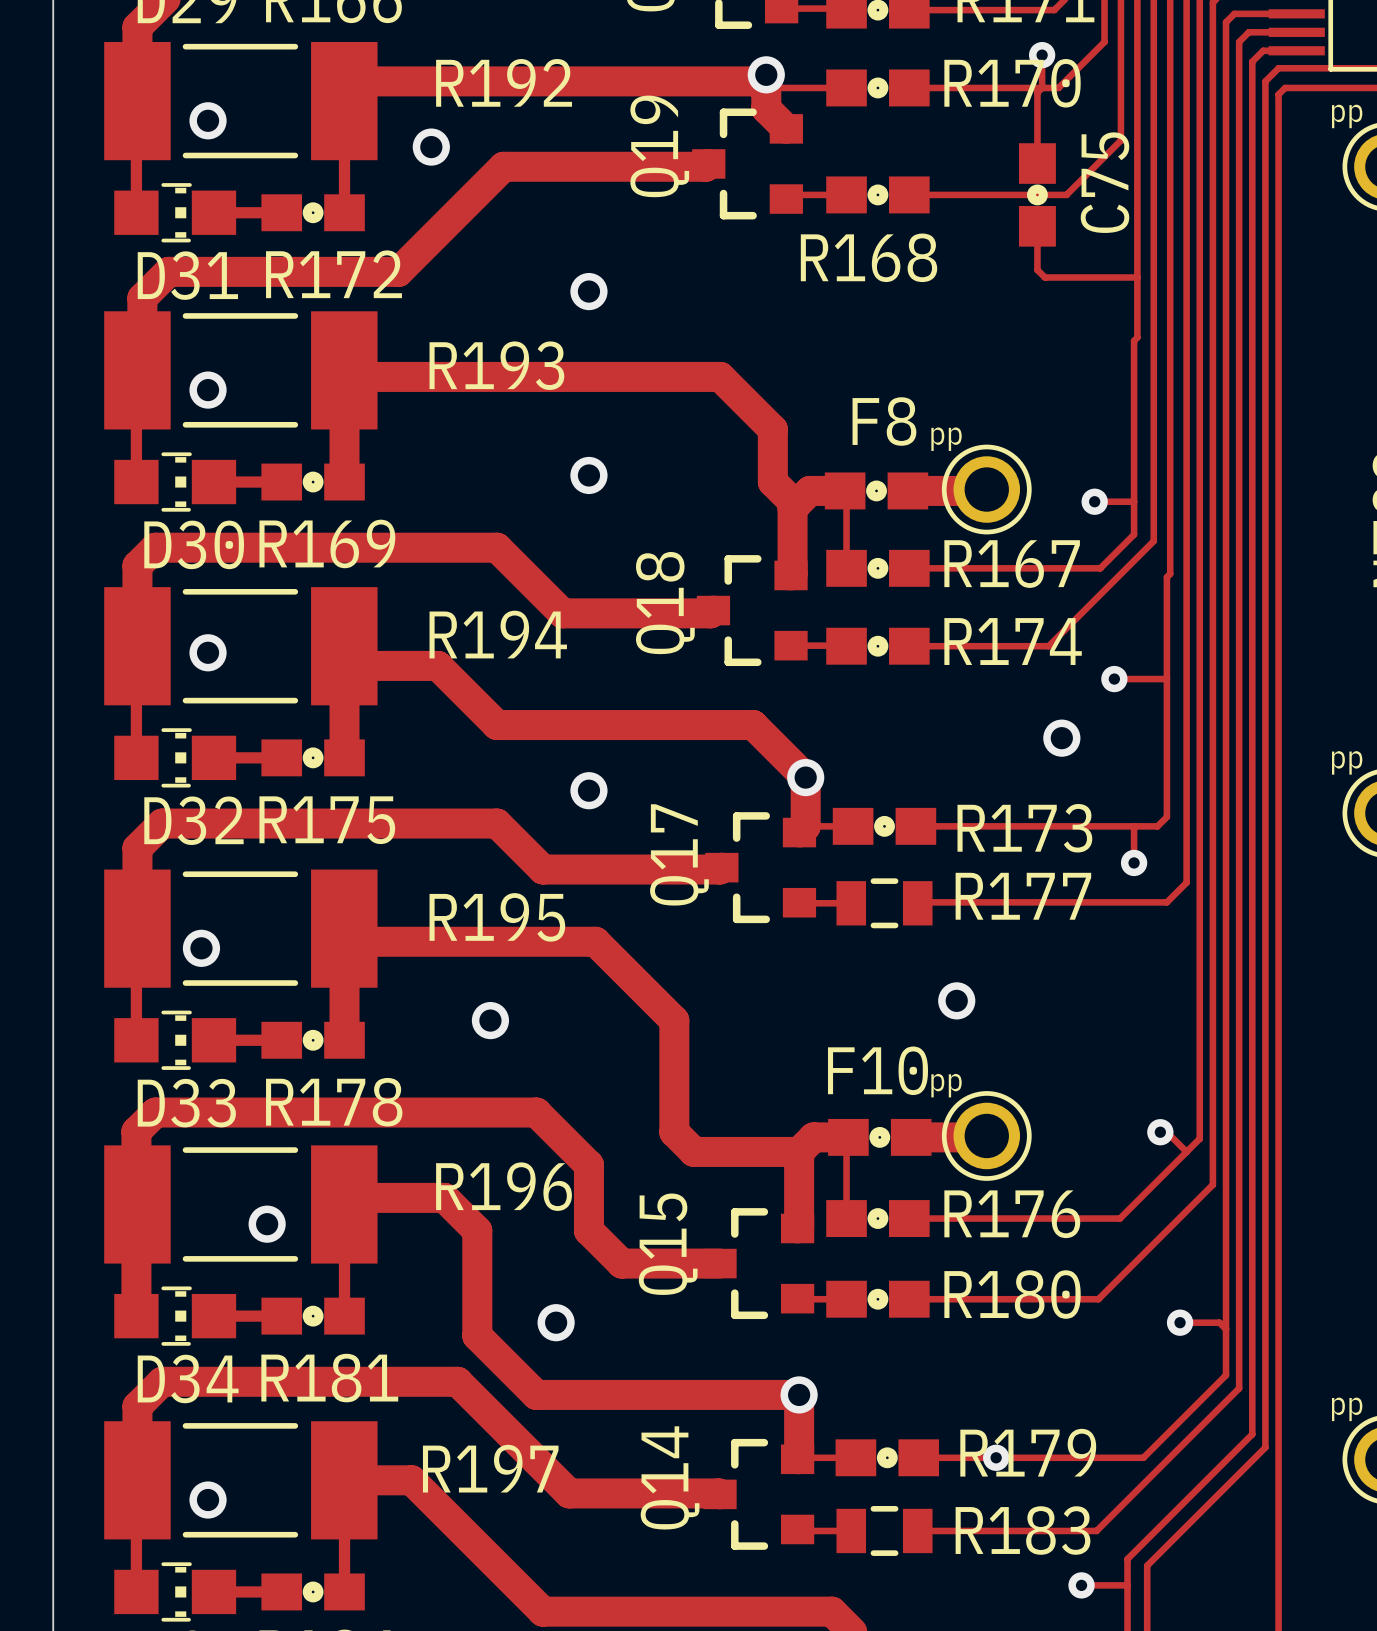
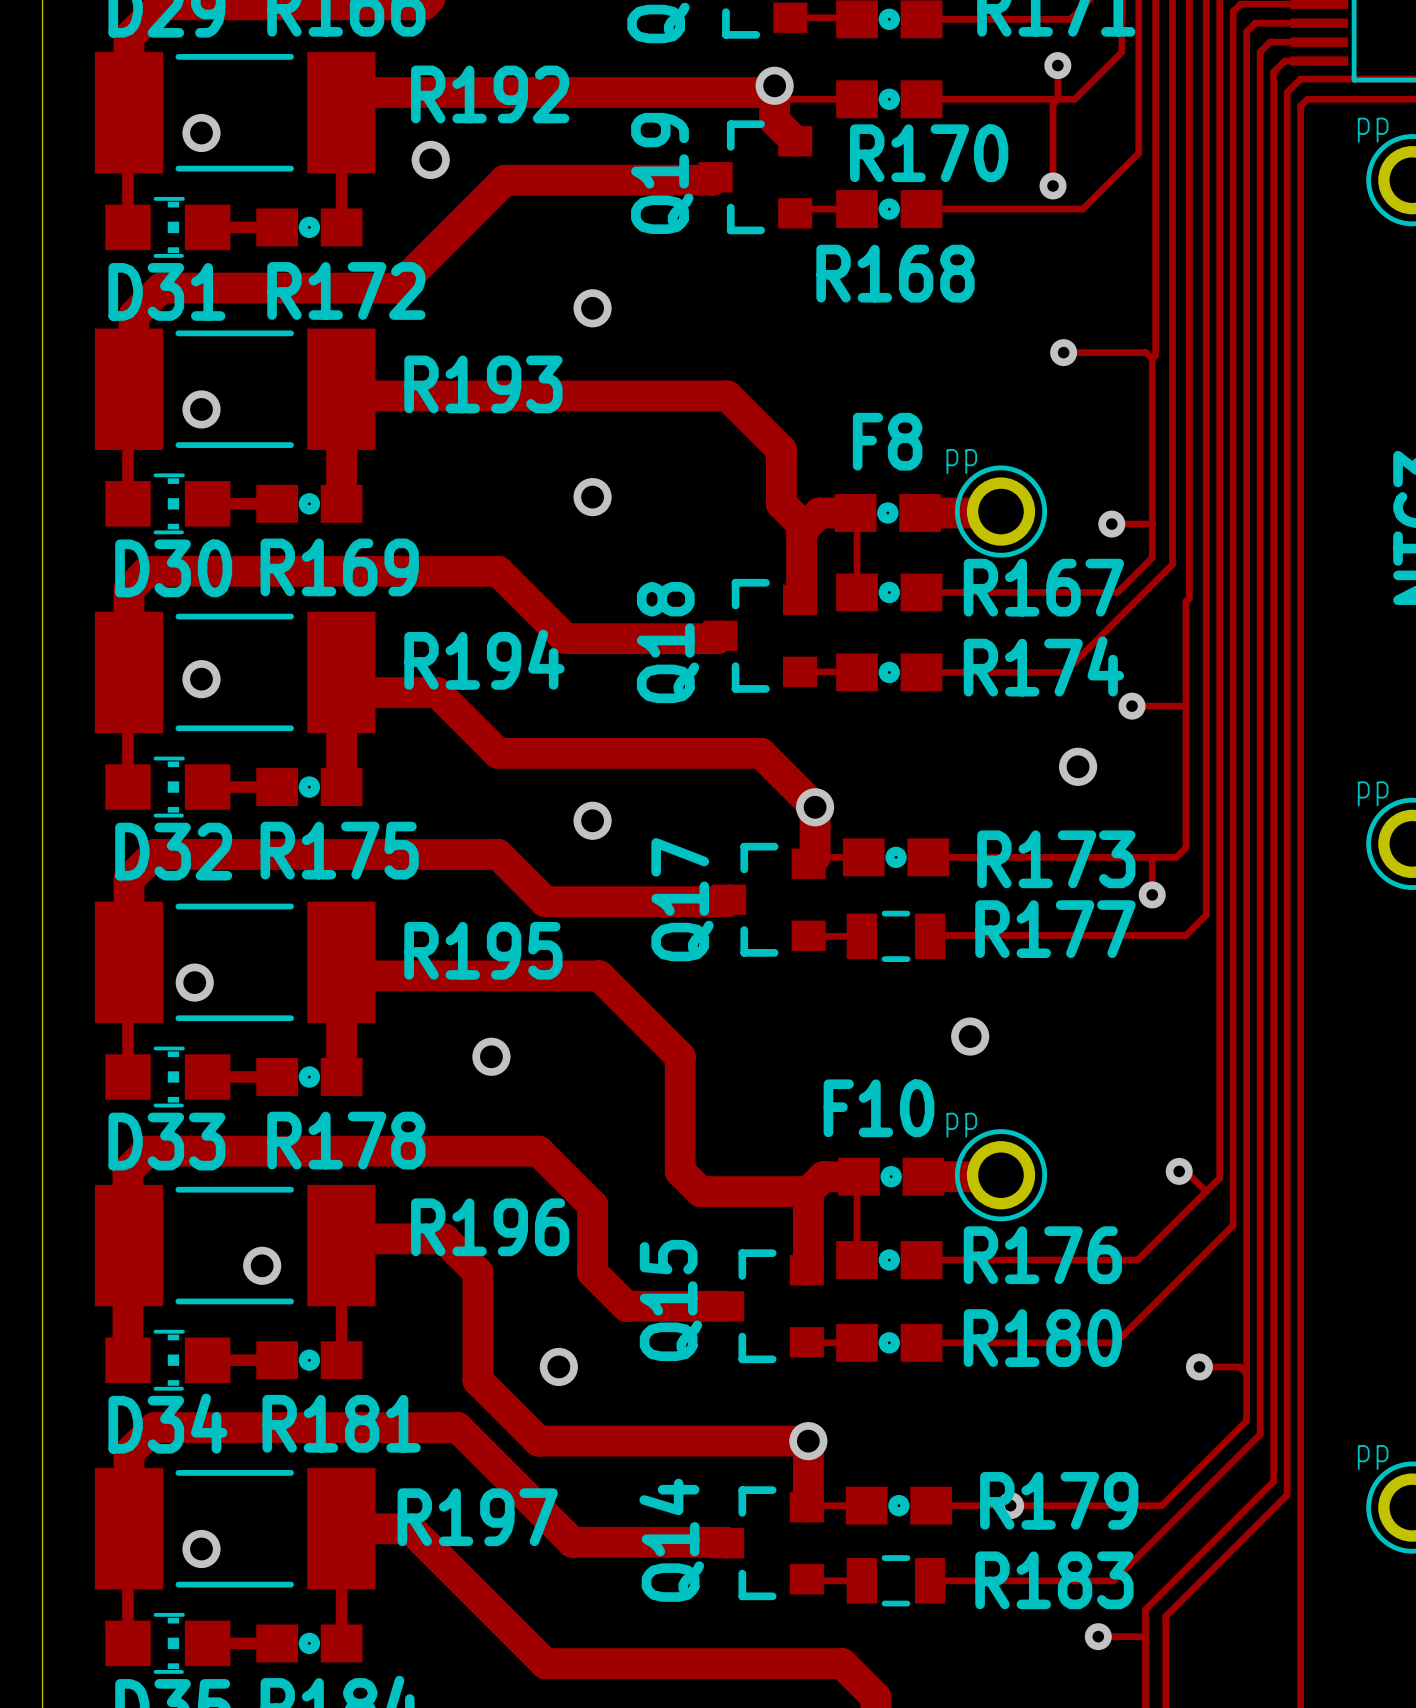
R170 name position: R170 (1012, 83) -> R170 (929, 153)
via: none -> (1053, 185)
C75: (1037, 194) -> none
track: (1037, 226) (1037, 269) (1044, 277) (1137, 277) -> none
track: none -> (1063, 352) (1145, 352) (1152, 358)
via: none -> (1063, 352)

